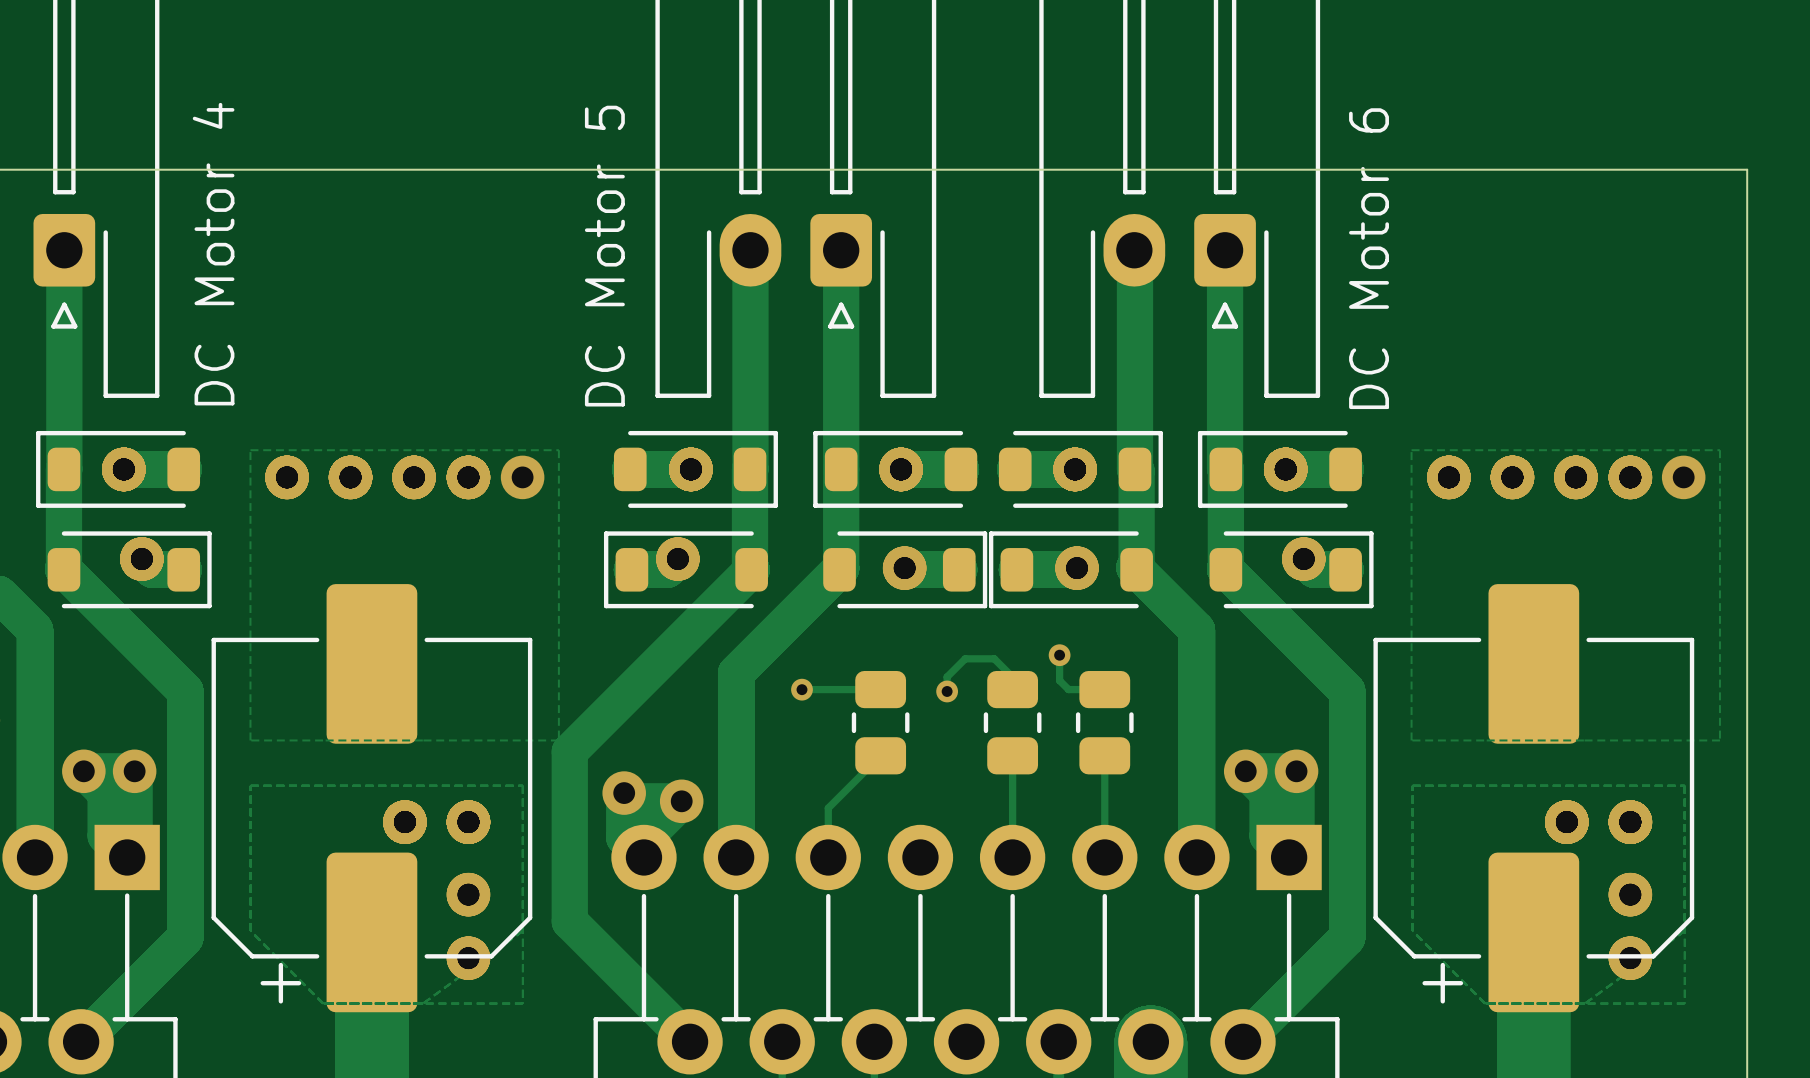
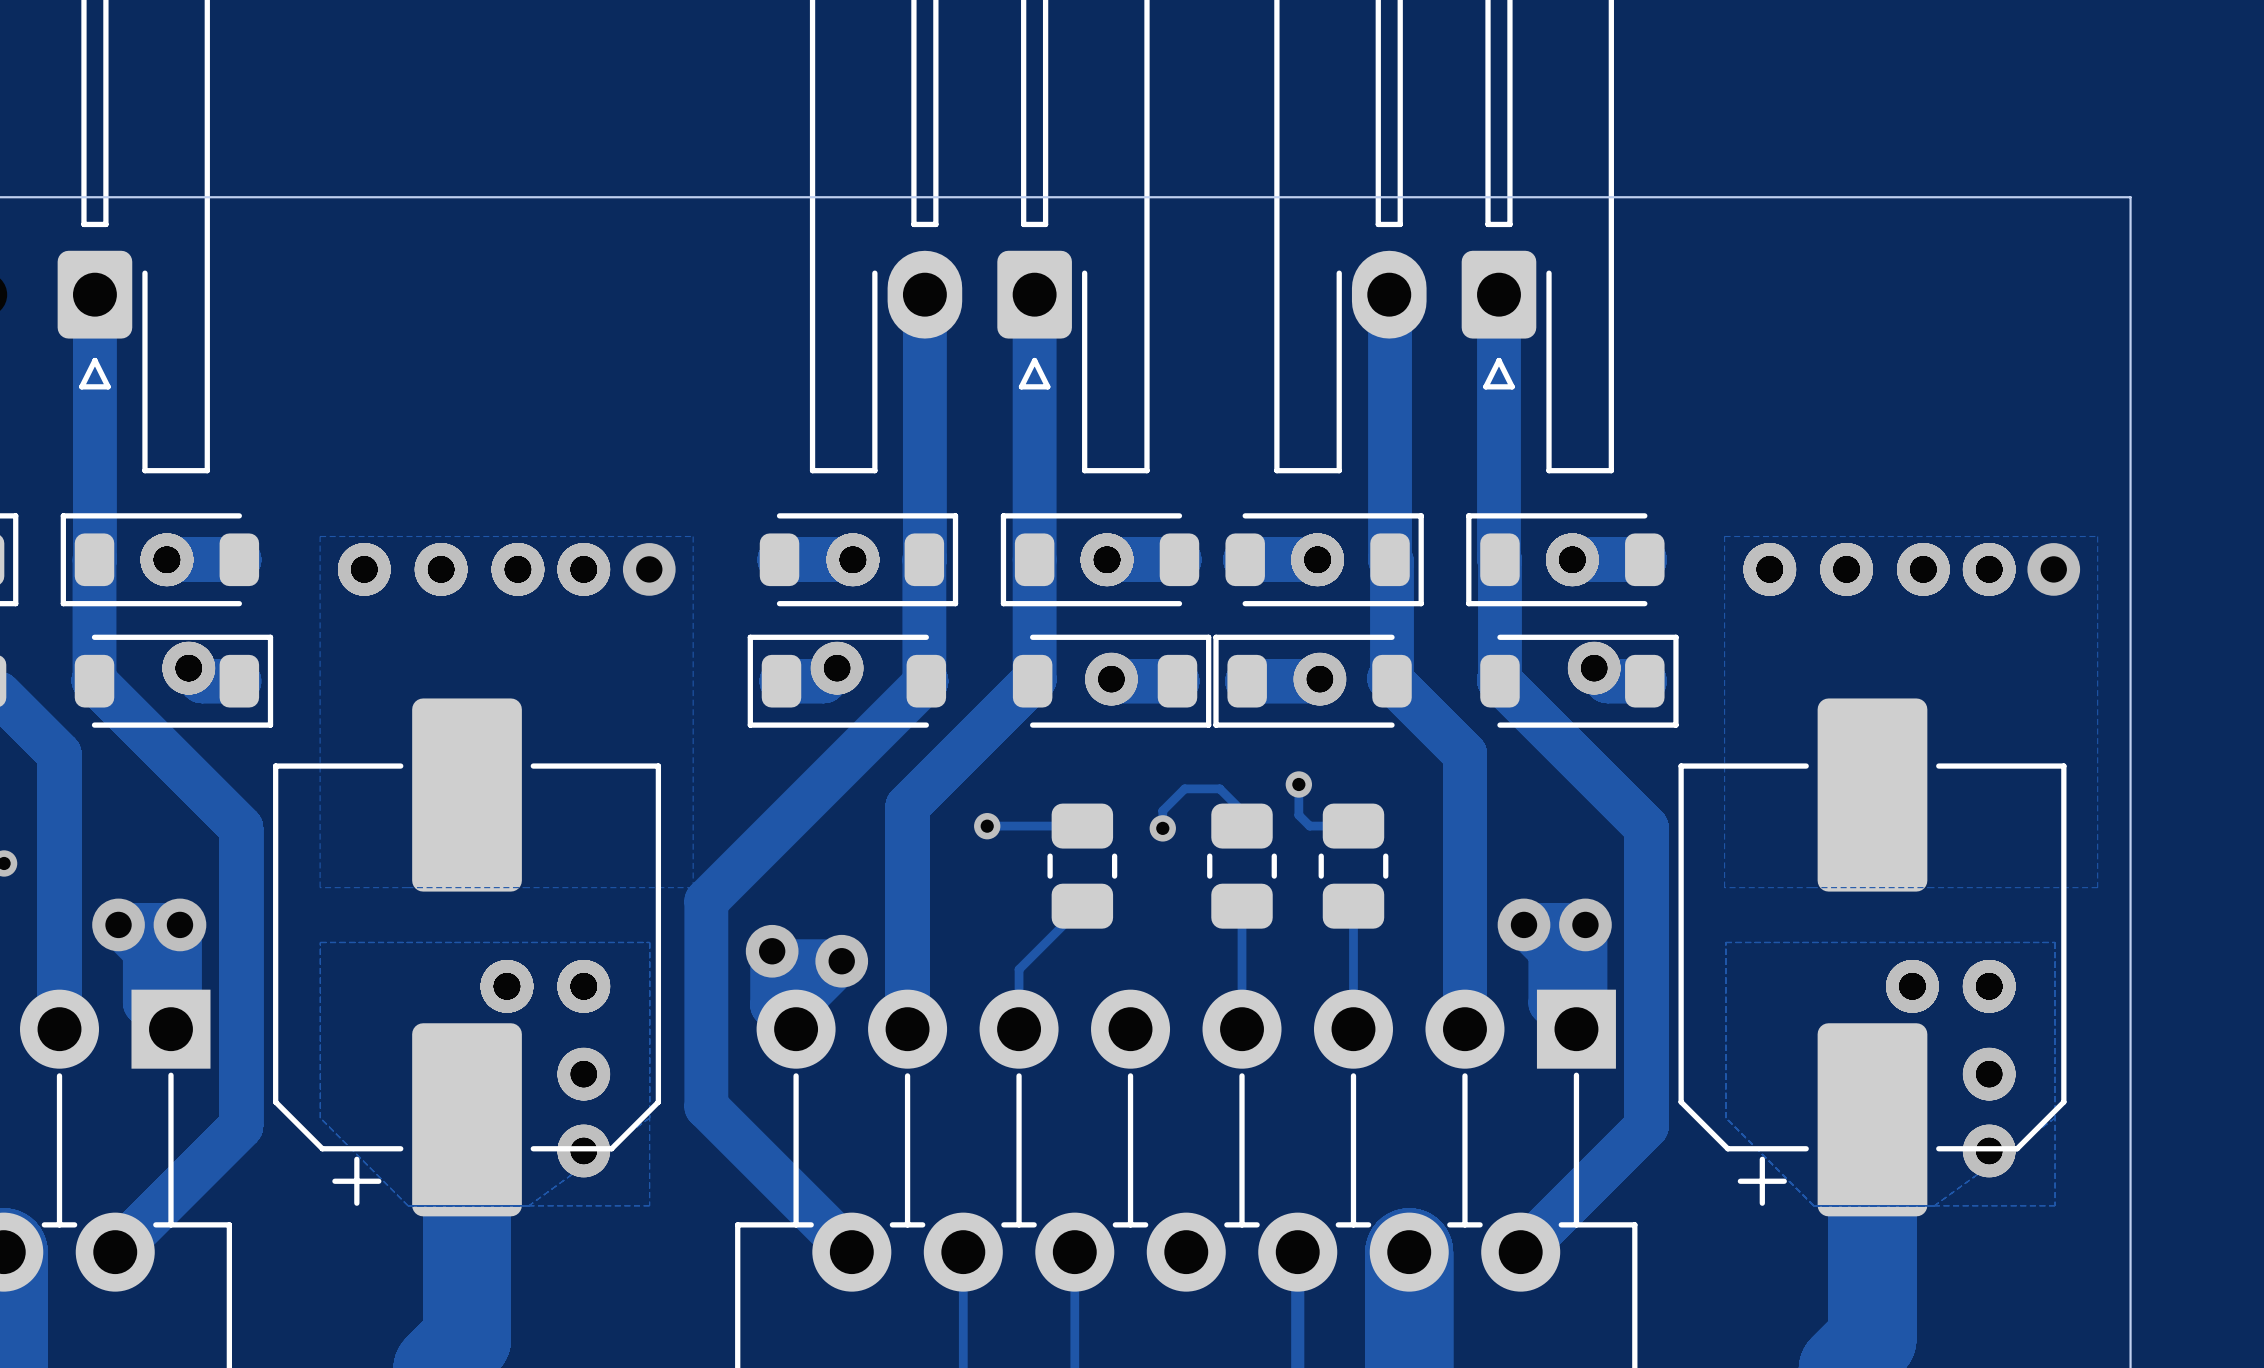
text: DC Motor 4 (213, 254) -> none
text: DC Motor 5 (604, 256) -> none
text: DC Motor 6 (1369, 258) -> none

